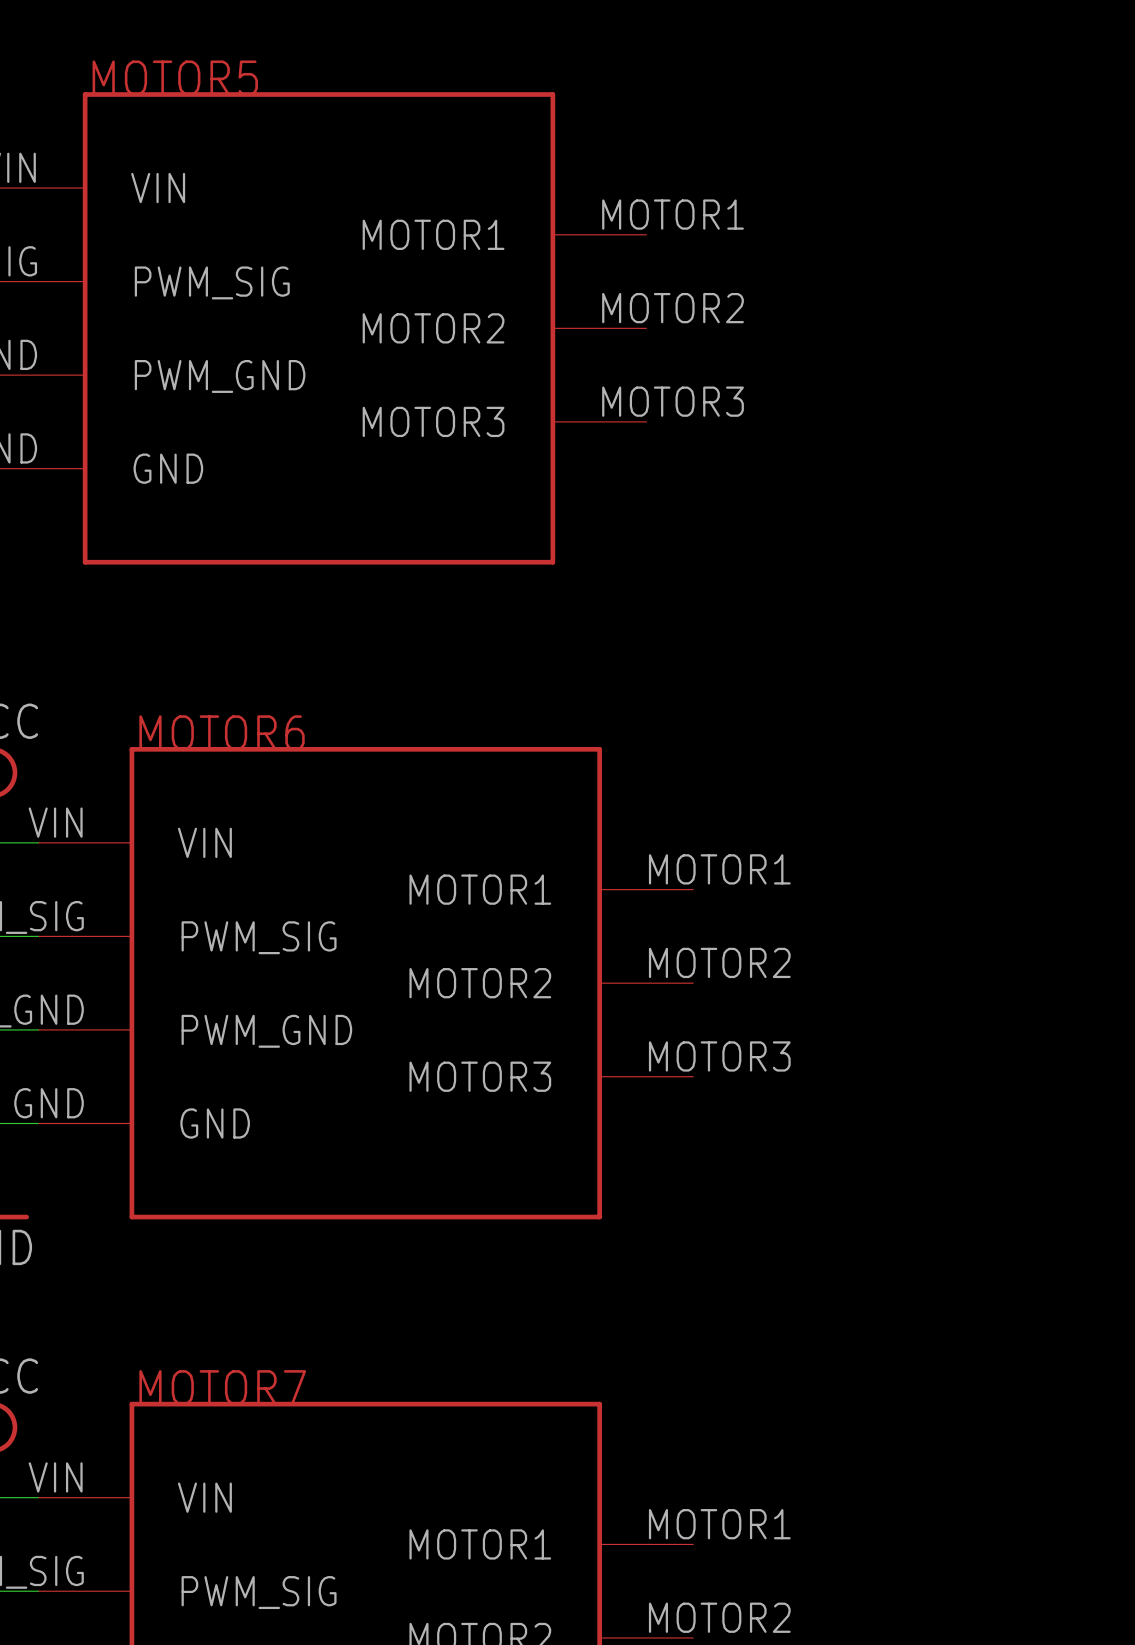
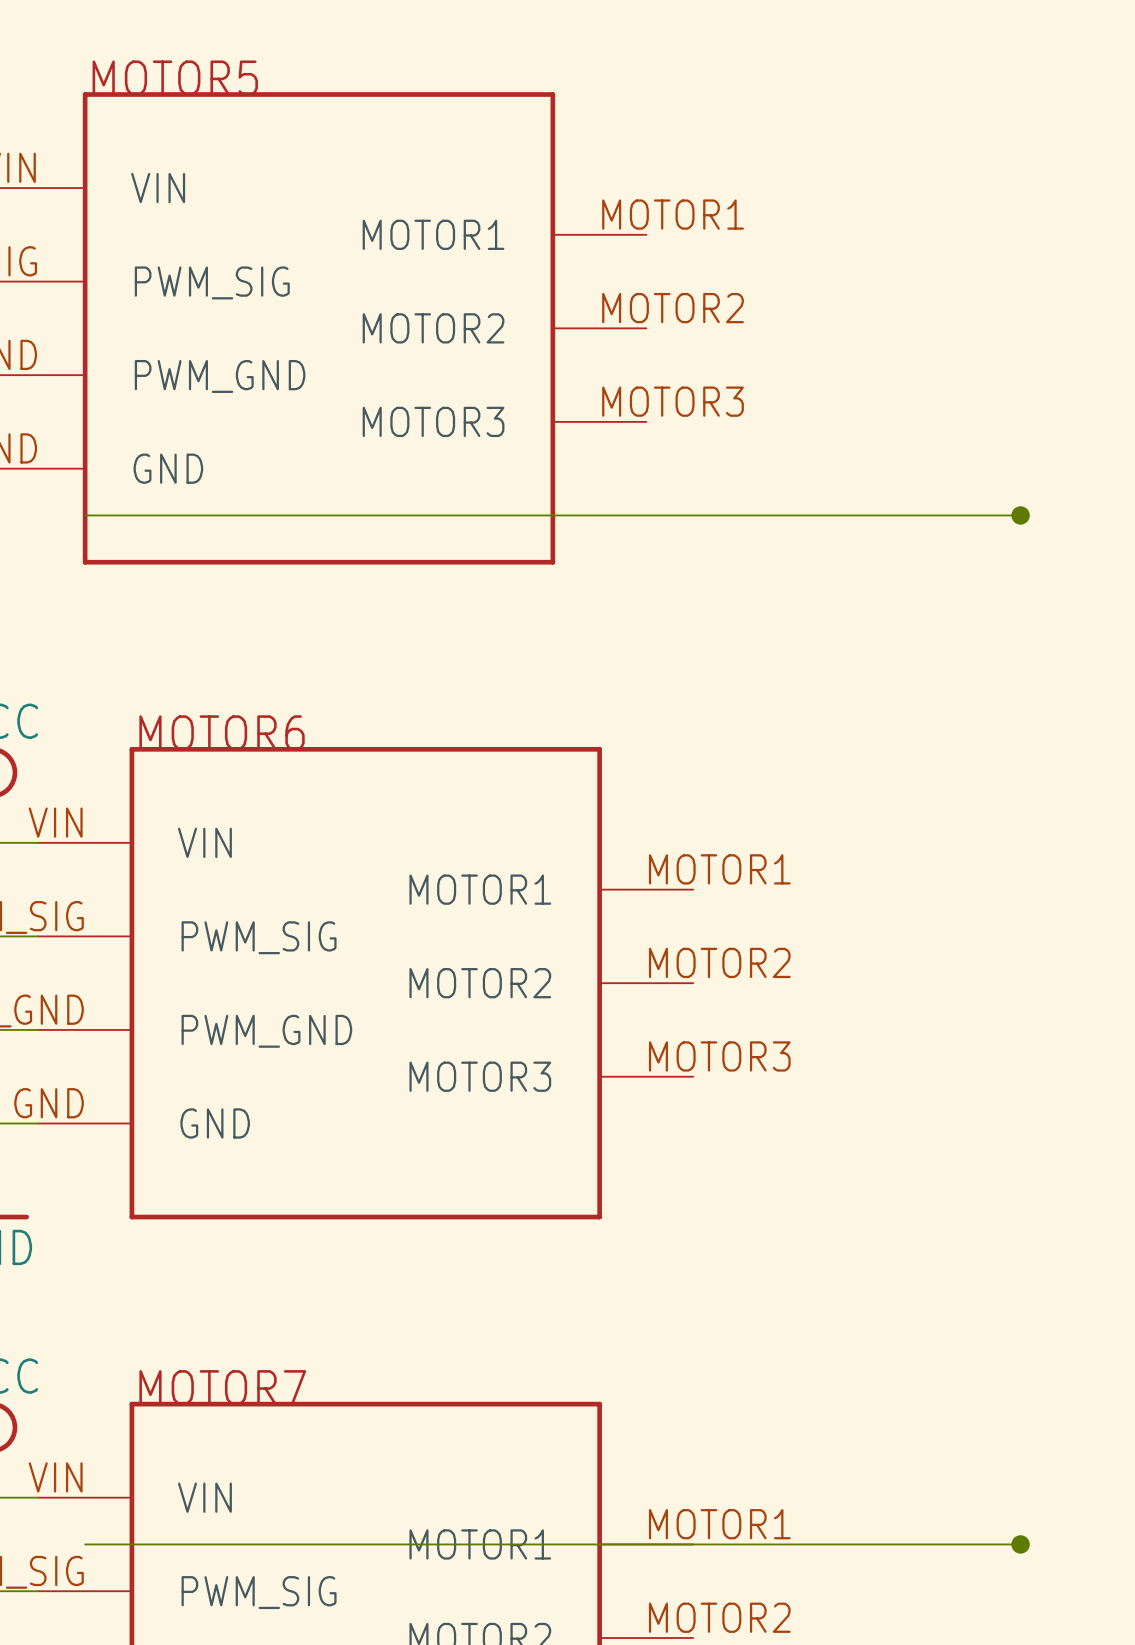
wire: none -> (85, 515) (1020, 515)
junction: none -> (1020, 515)
wire: none -> (85, 1544) (1020, 1544)
junction: none -> (1020, 1544)

